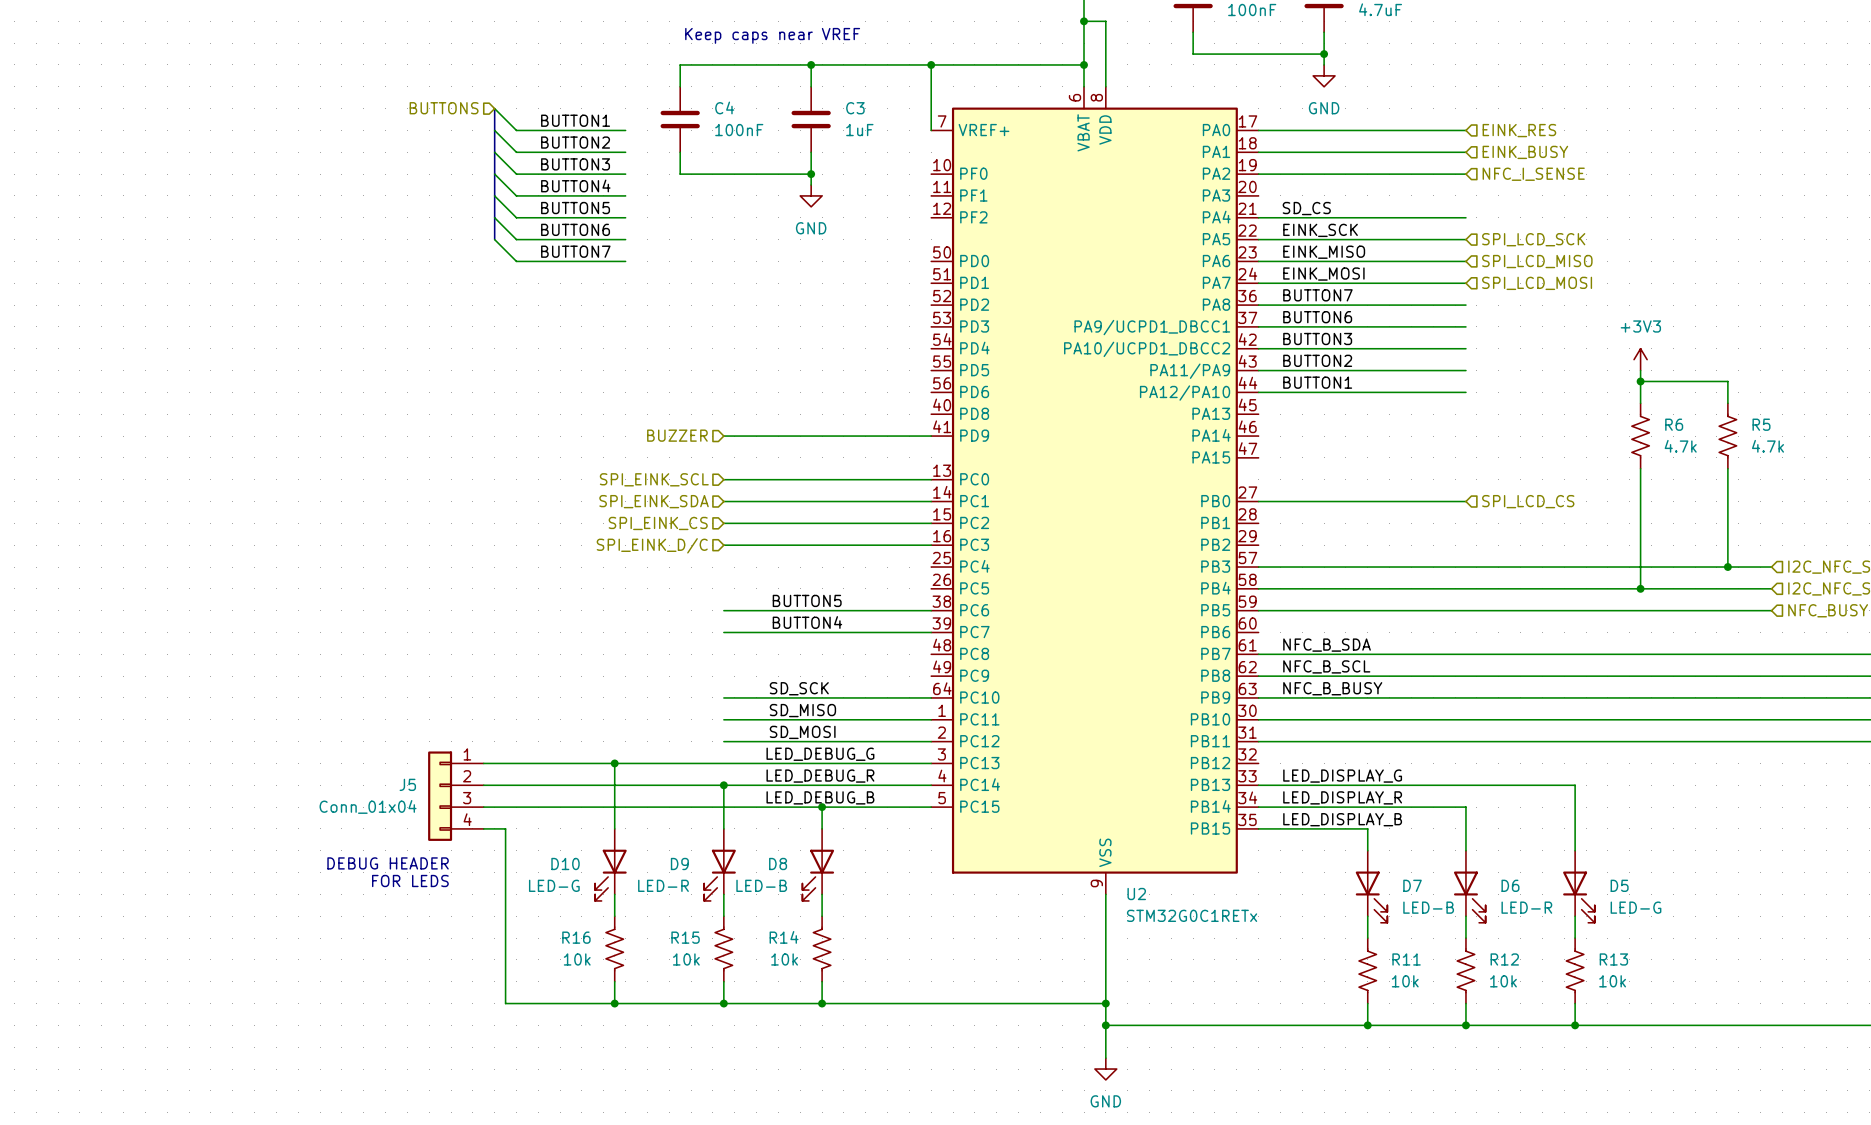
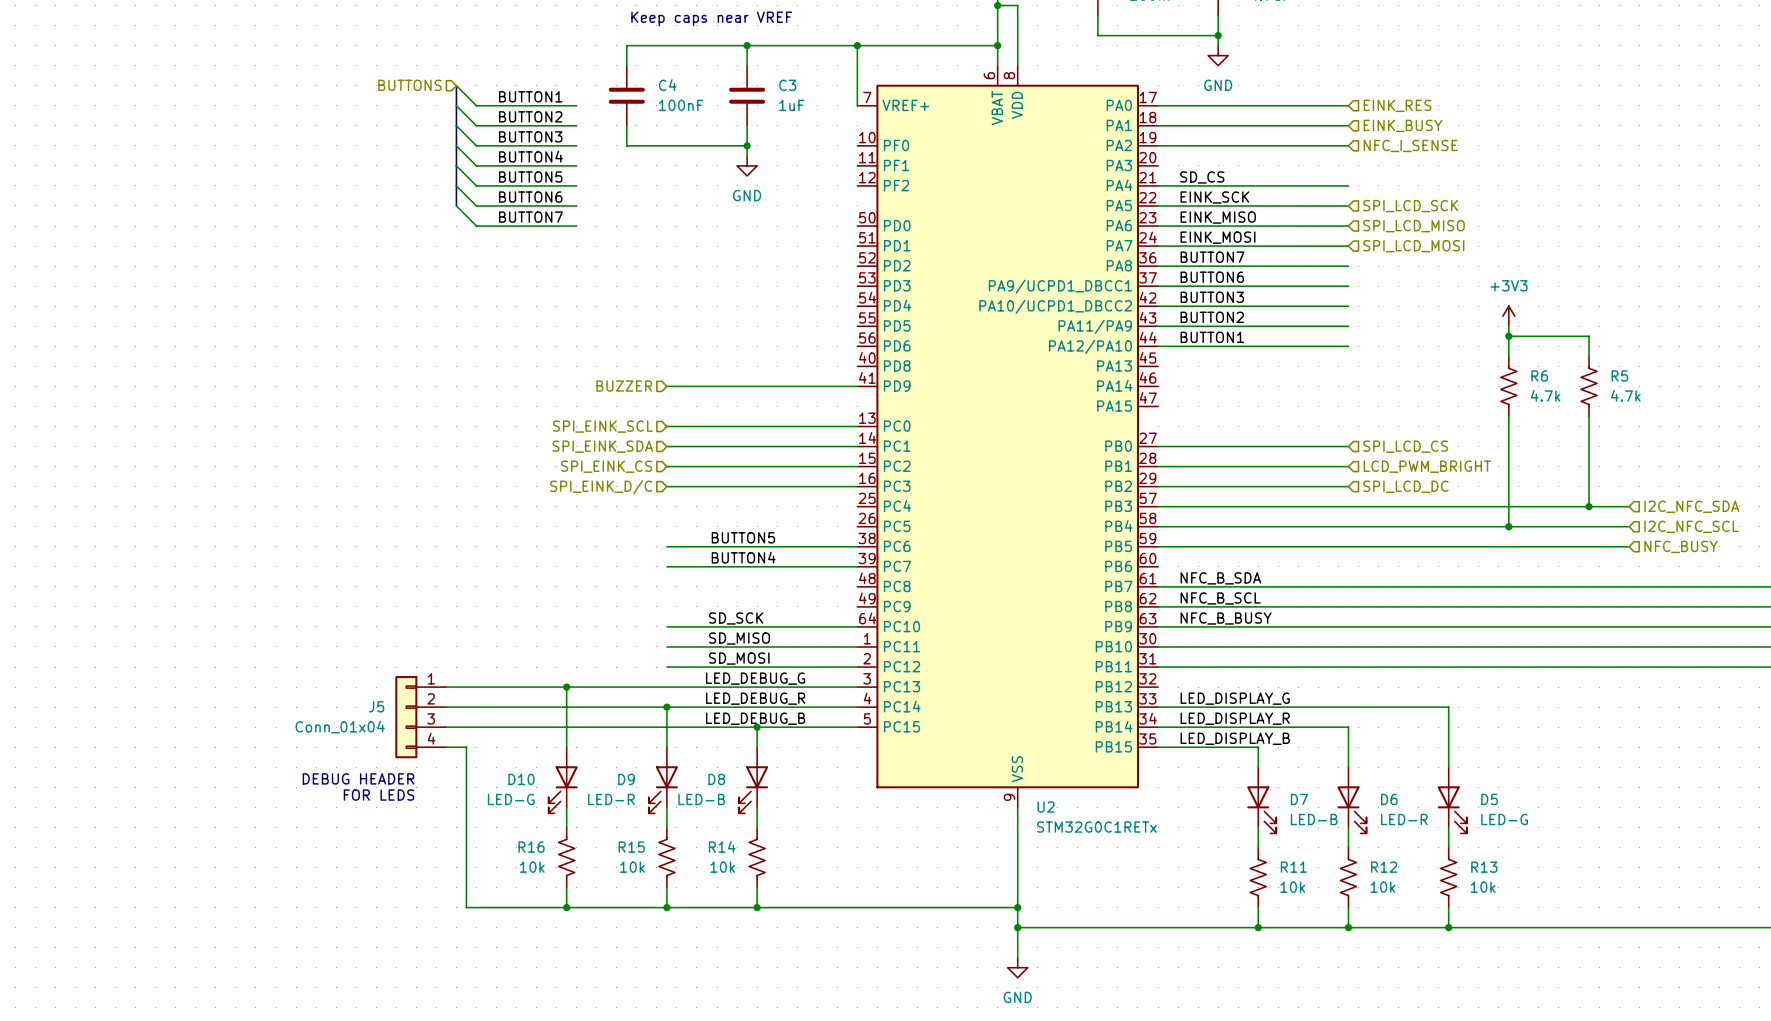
wire: none -> (1158, 466) (1348, 466)
hierarchical label: none -> LCD_PWM_BRIGHT (1427, 466)
wire: none -> (1158, 486) (1348, 486)
hierarchical label: none -> SPI_LCD_DC (1405, 486)

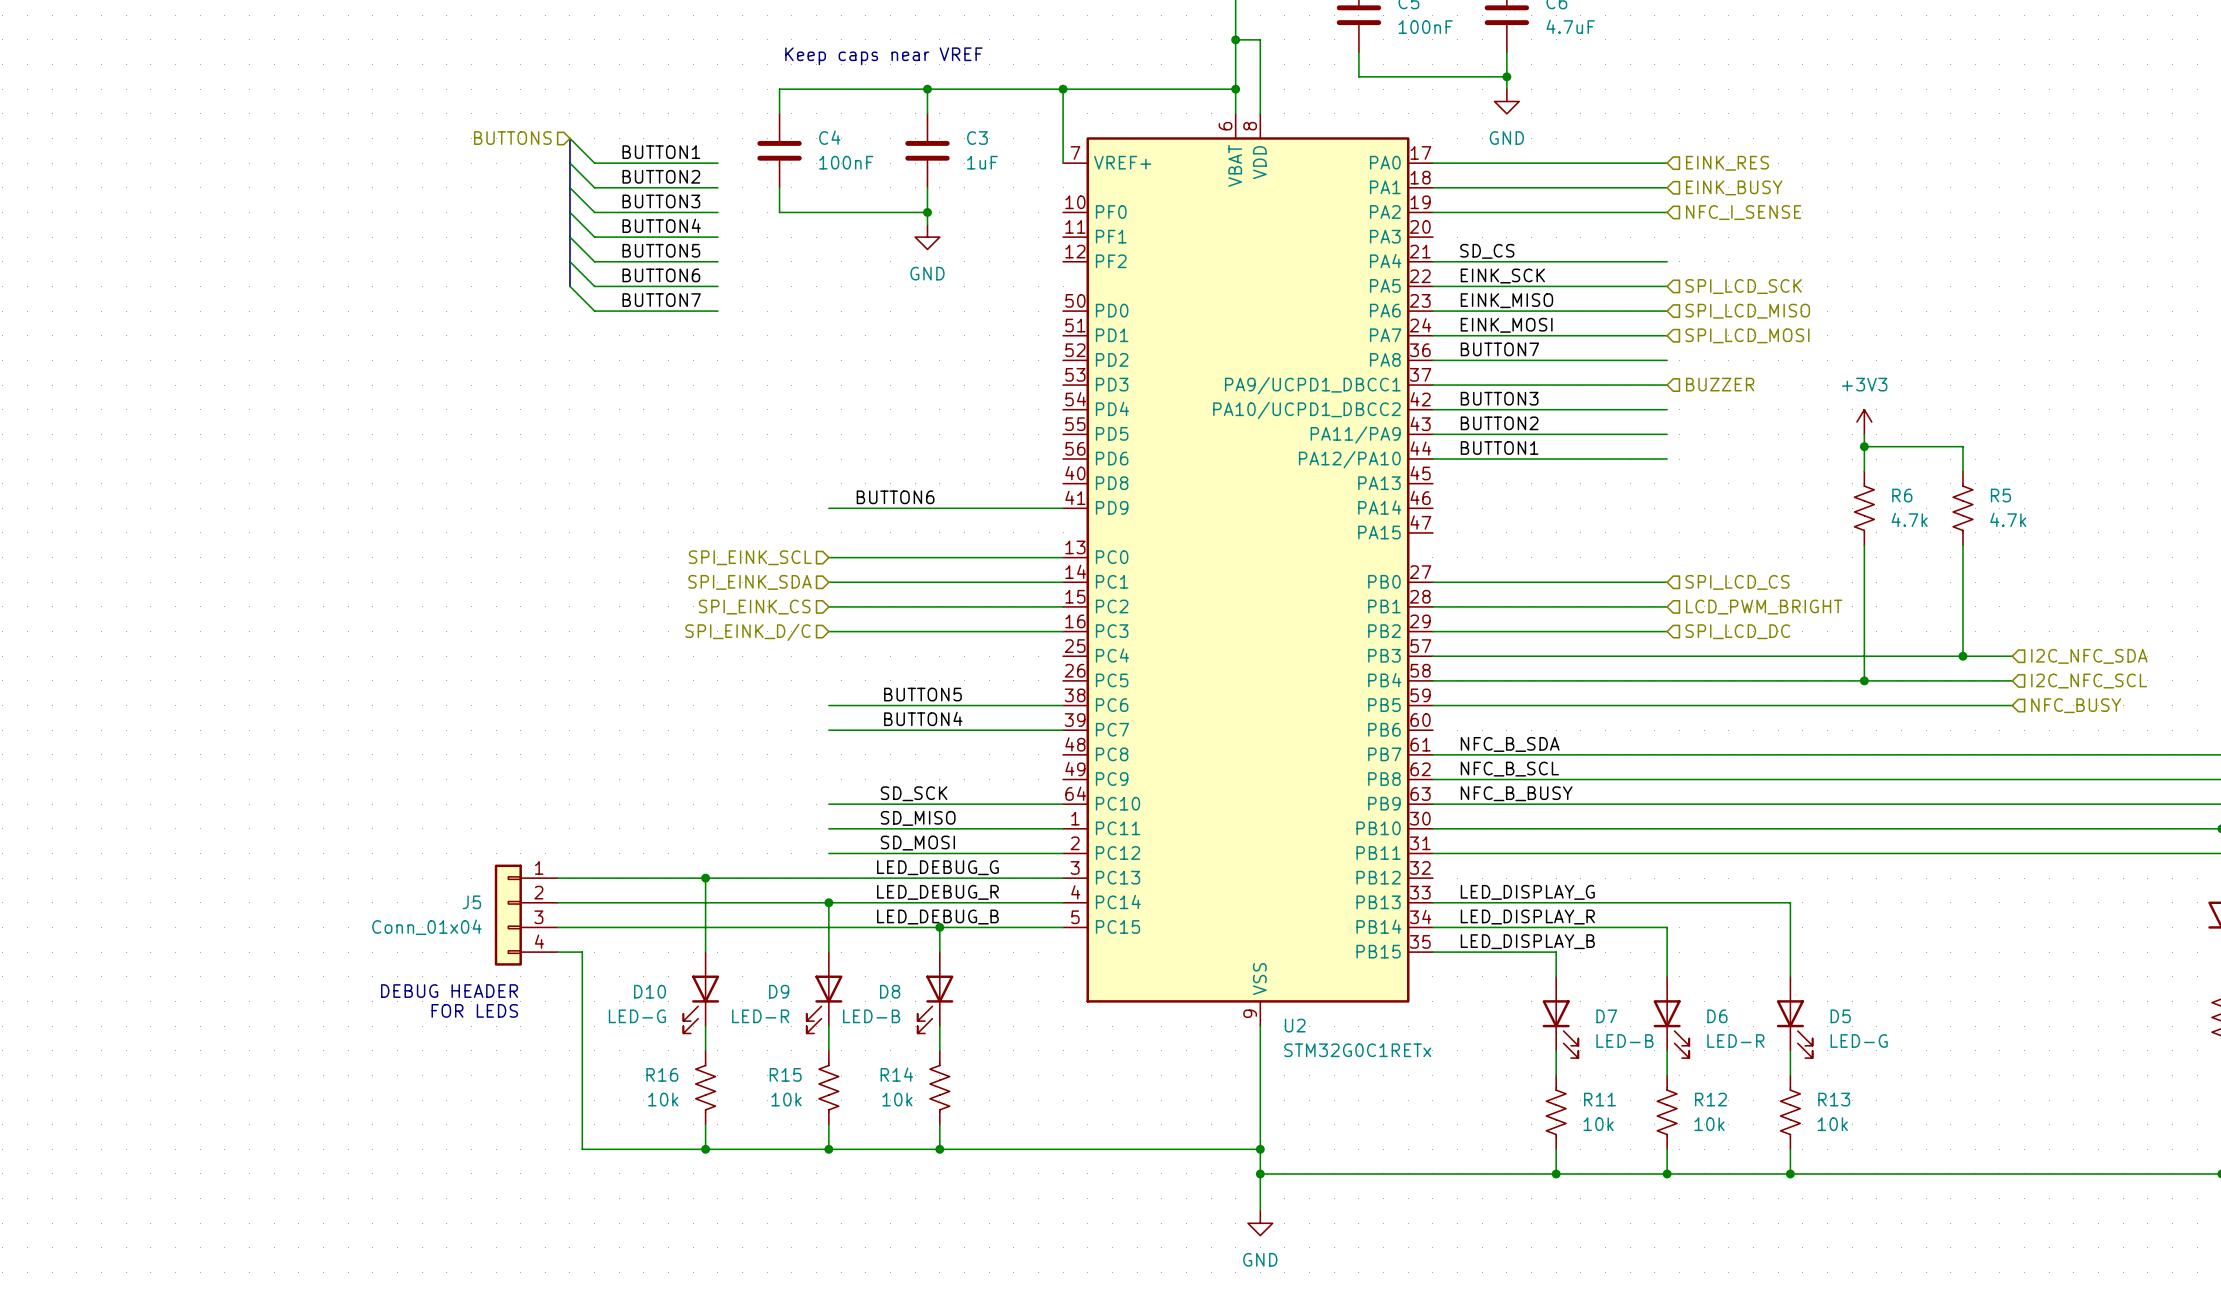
label: BUTTON6 (1212, 277) -> none
hierarchical label: none -> BUZZER (1720, 384)
label: none -> BUTTON6 (895, 497)
hierarchical label: BUZZER (624, 386) -> none

